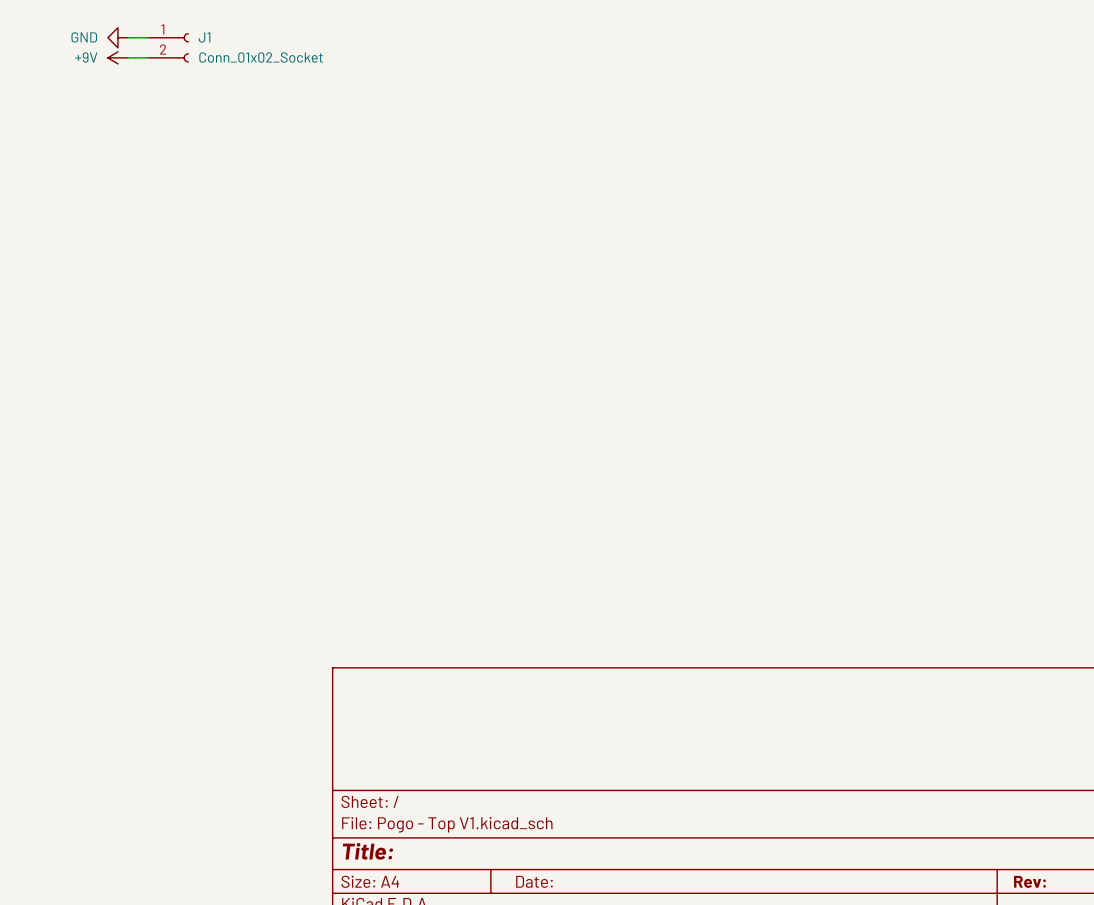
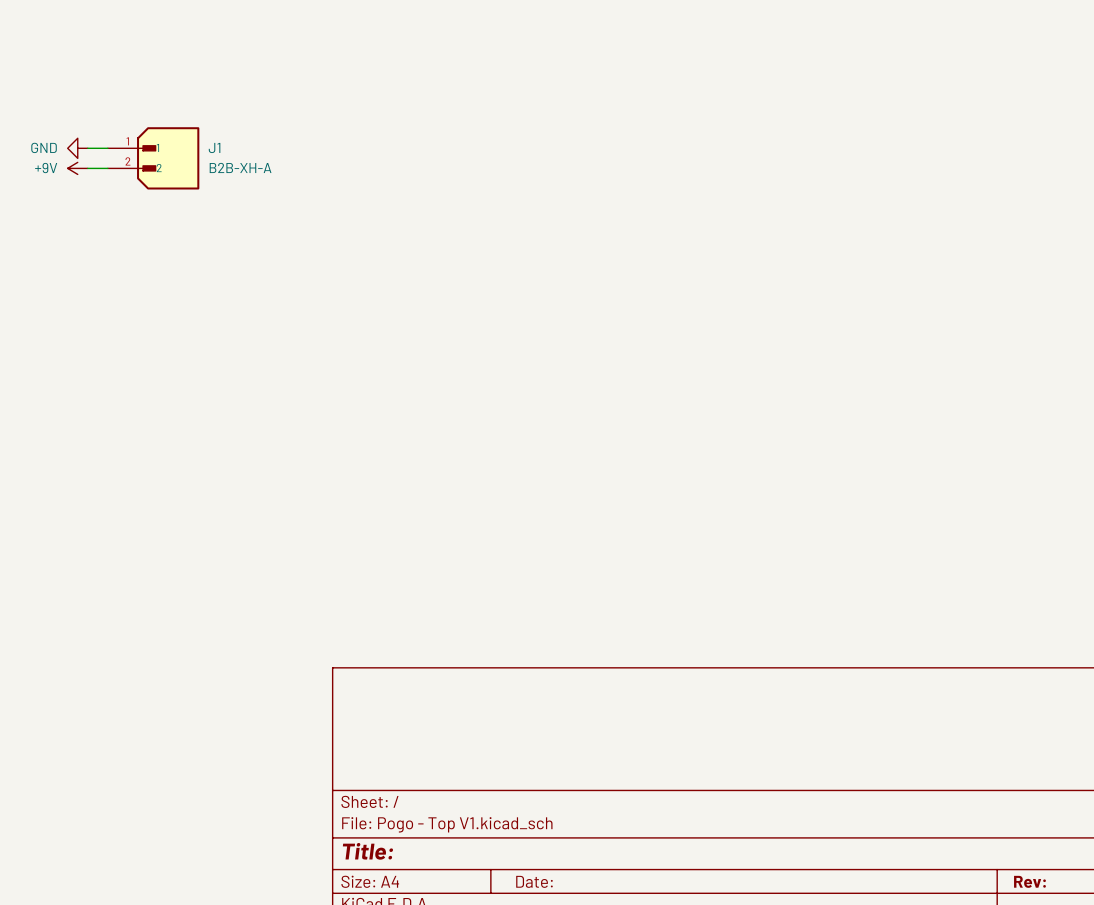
J1 symbol: [148, 33, 189, 63] -> [107, 127, 200, 190]
power symbol position: GND (117, 37) -> GND (77, 148)
wire: (127, 37) (148, 37) -> (87, 148) (107, 148)
J1 name position: J1 (204, 37) -> J1 (214, 147)
power symbol position: +9V (117, 57) -> +9V (77, 168)
wire: (127, 57) (148, 57) -> (87, 168) (107, 168)
J1 value: Conn_01x02_Socket (261, 57) -> B2B-XH-A (240, 167)

